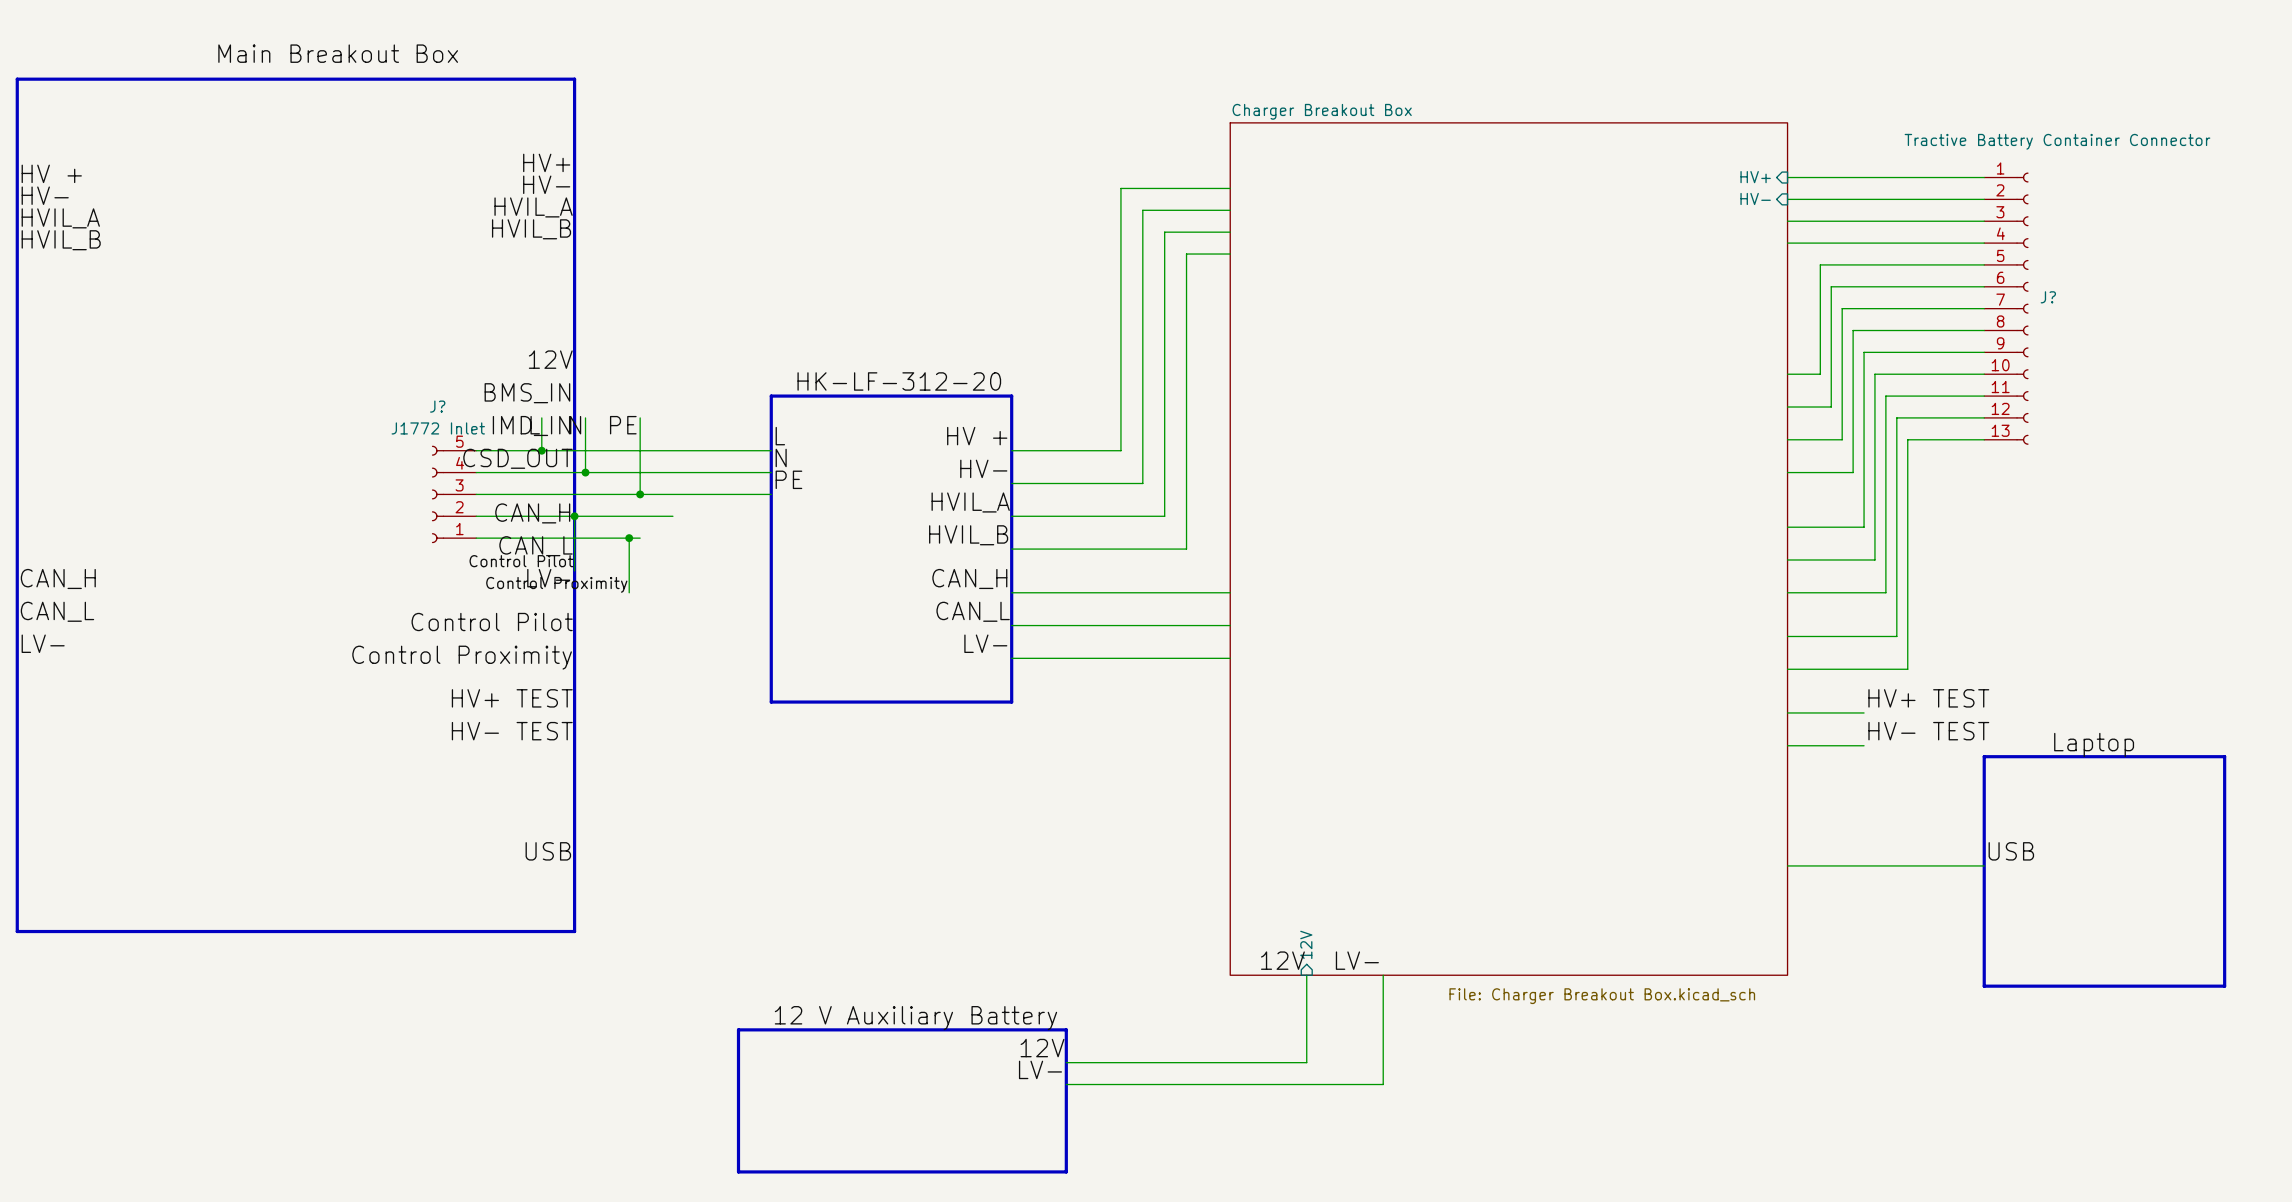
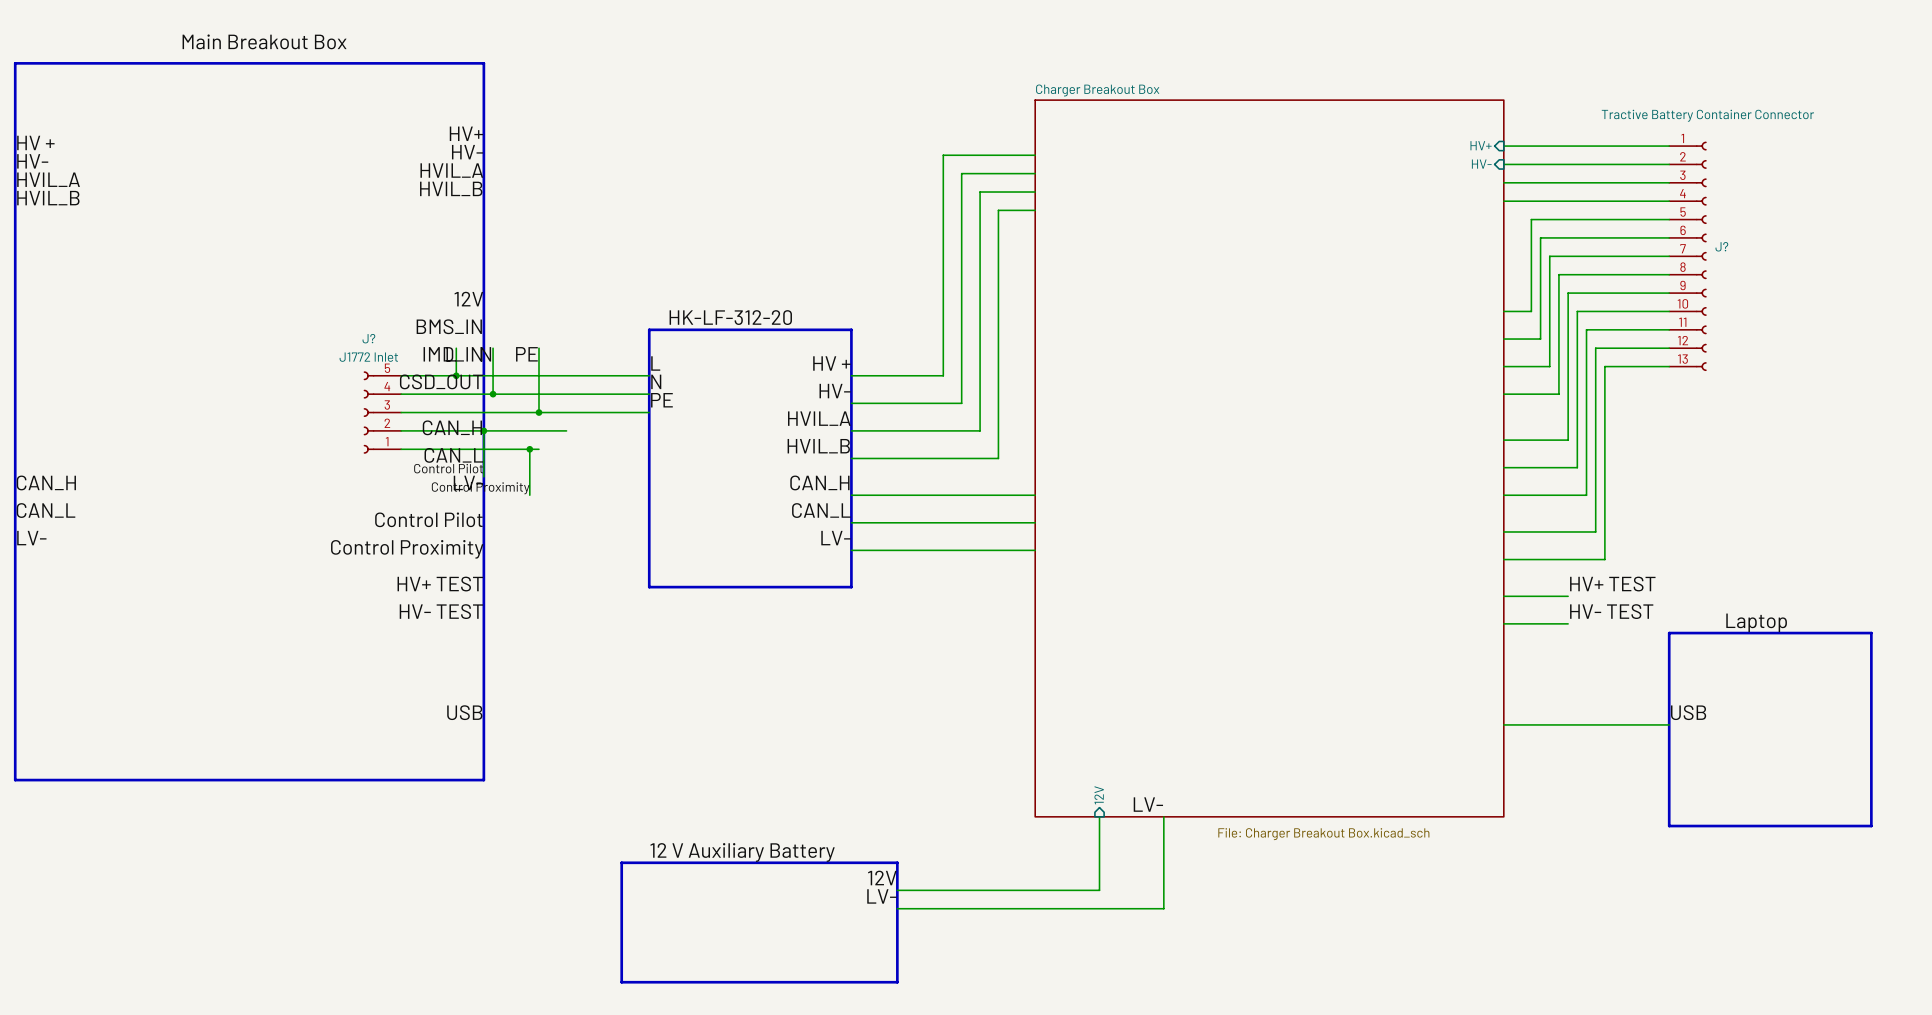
label: 12V (1282, 960) -> none

